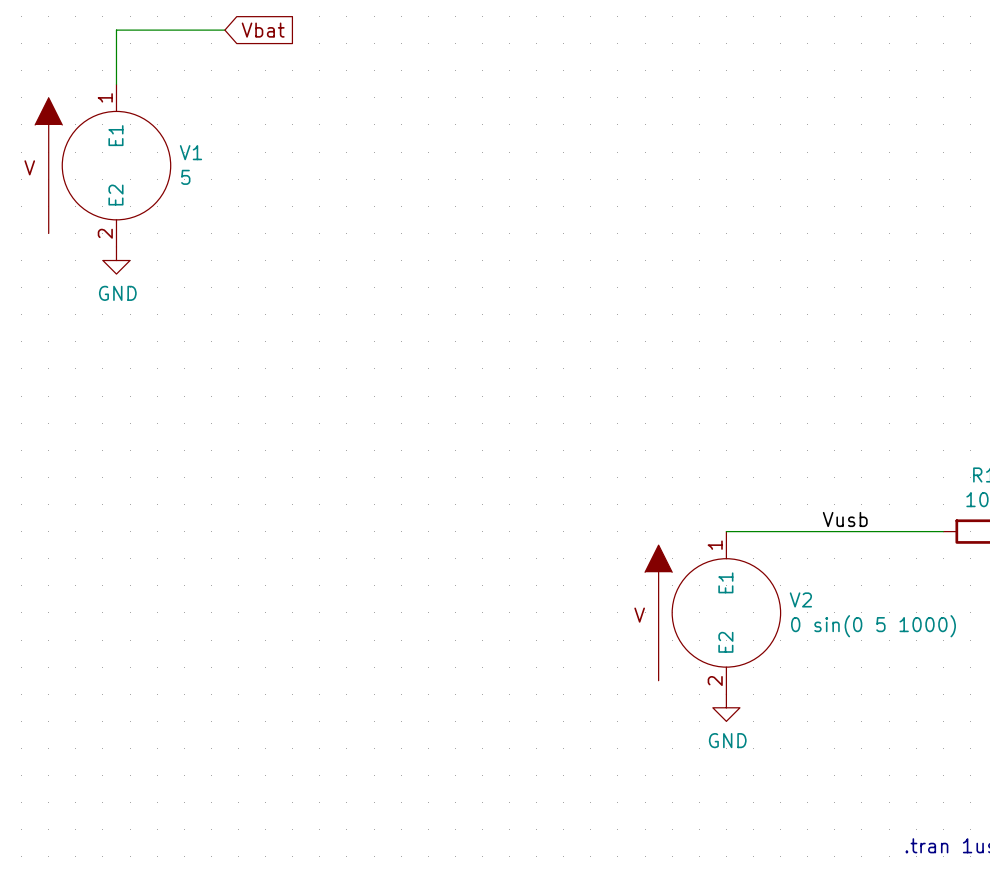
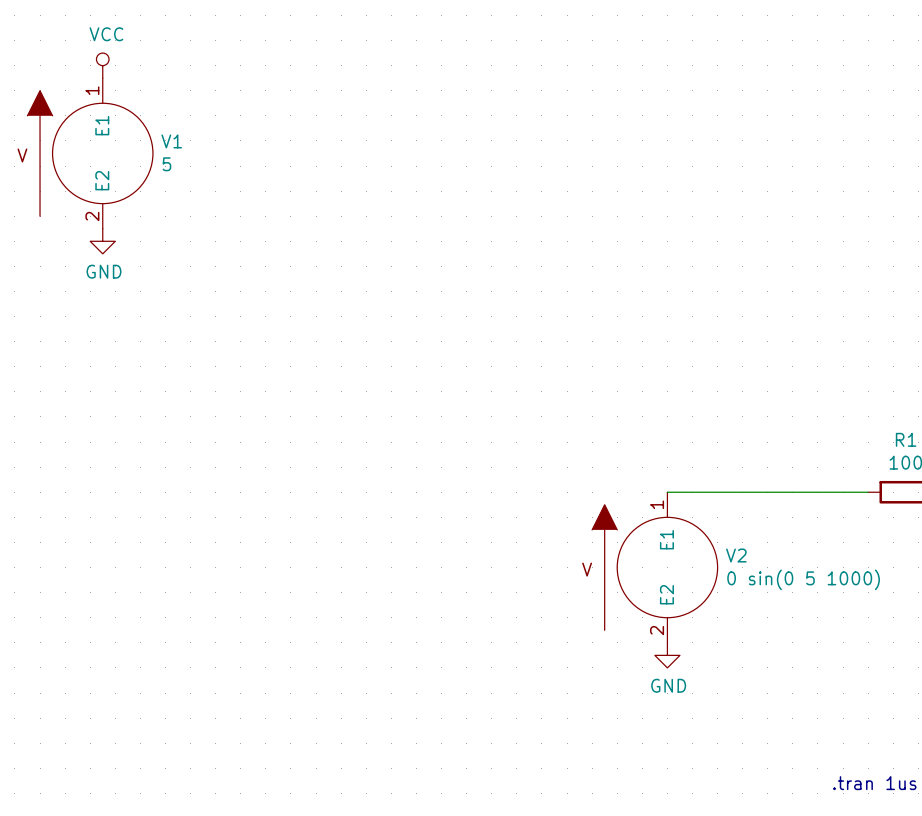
wire: (224, 30) (116, 30) (116, 84) -> none
global label: Vbat (263, 30) -> none
power symbol: none -> VCC (102, 65)
label: Vusb (845, 519) -> none

